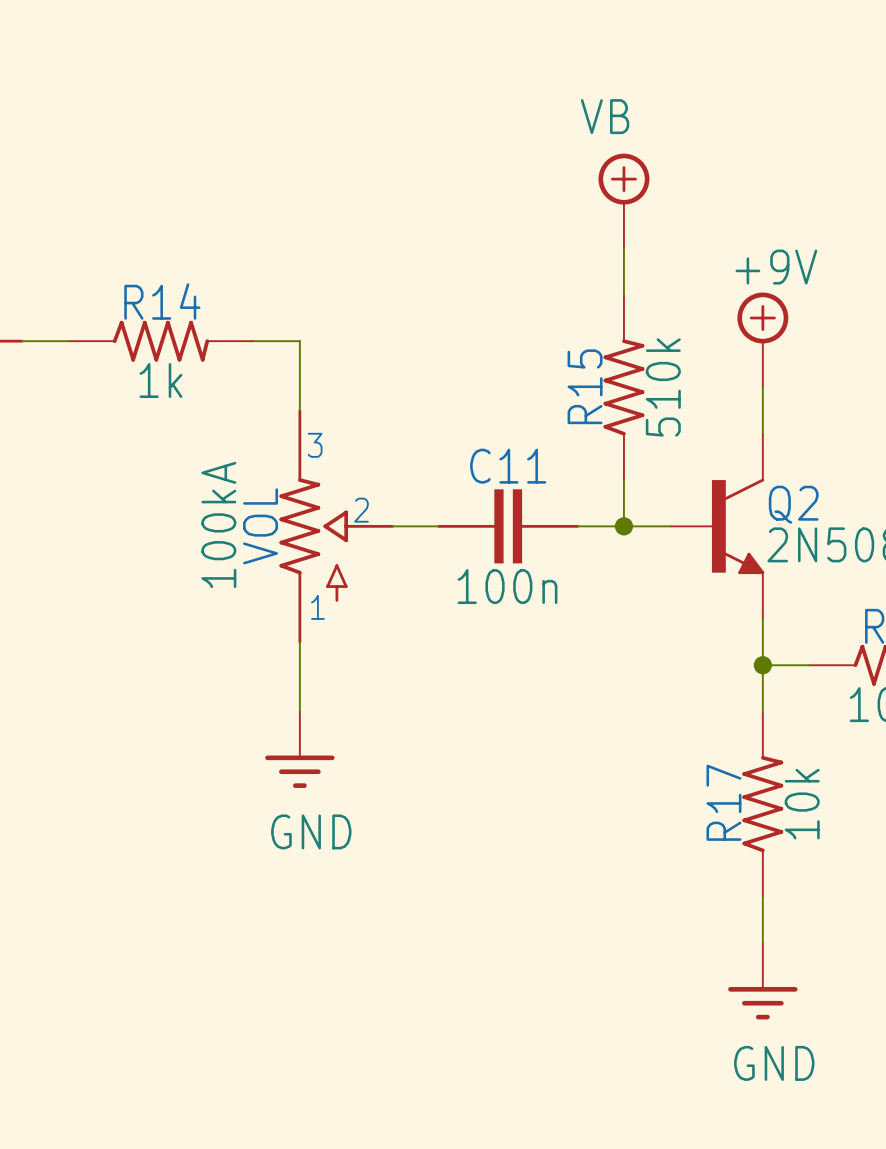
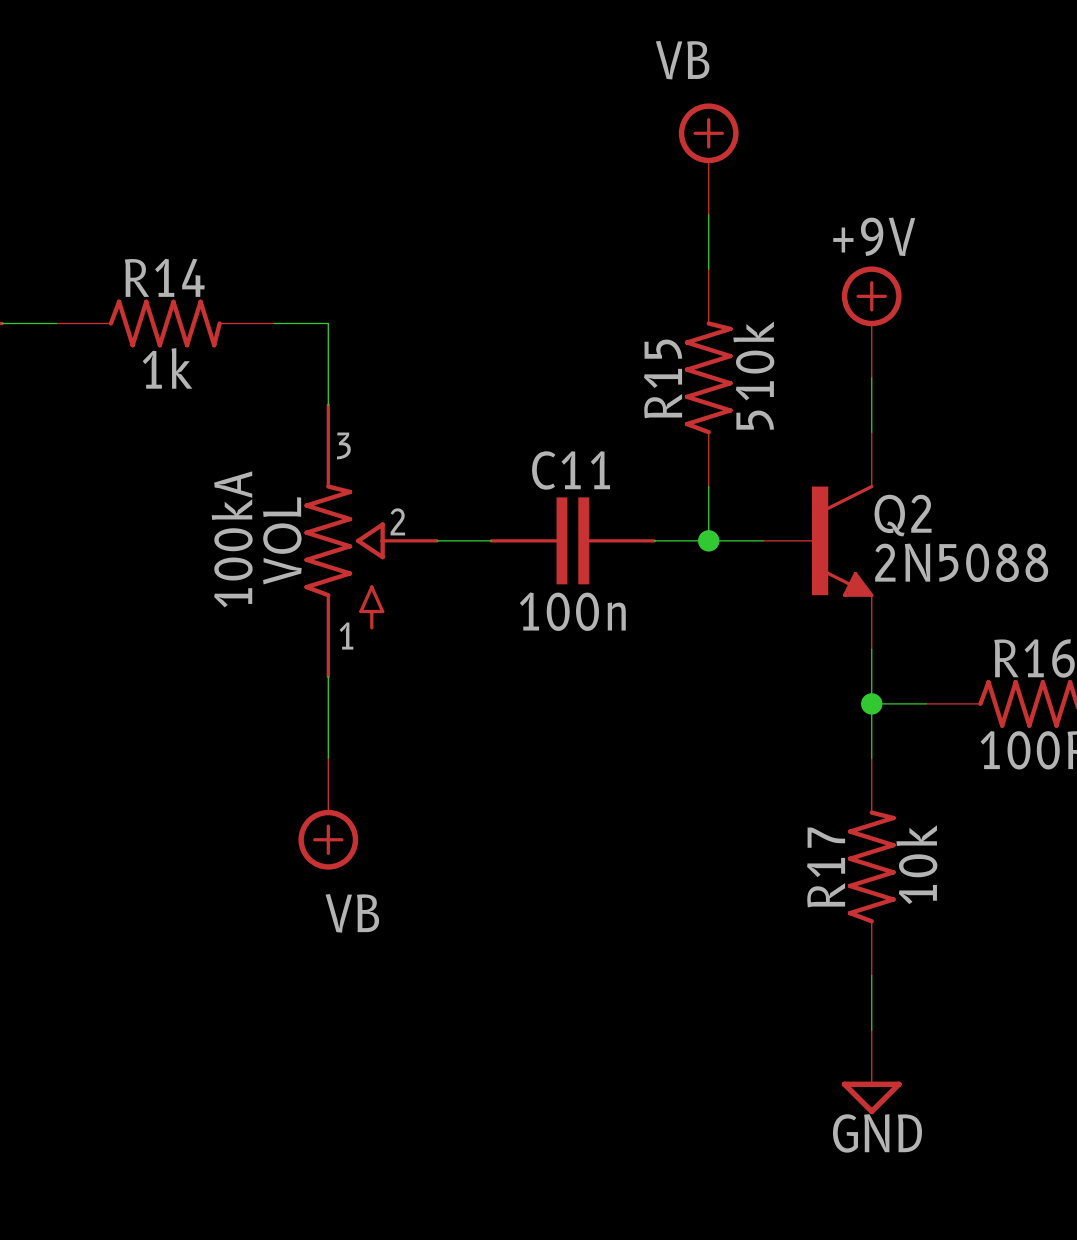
power symbol: GND (299, 749) -> VB (328, 813)
power symbol shape: [728, 943, 798, 1020] -> [841, 1029, 902, 1115]
power symbol text position: GND (774, 1063) -> GND (877, 1133)

